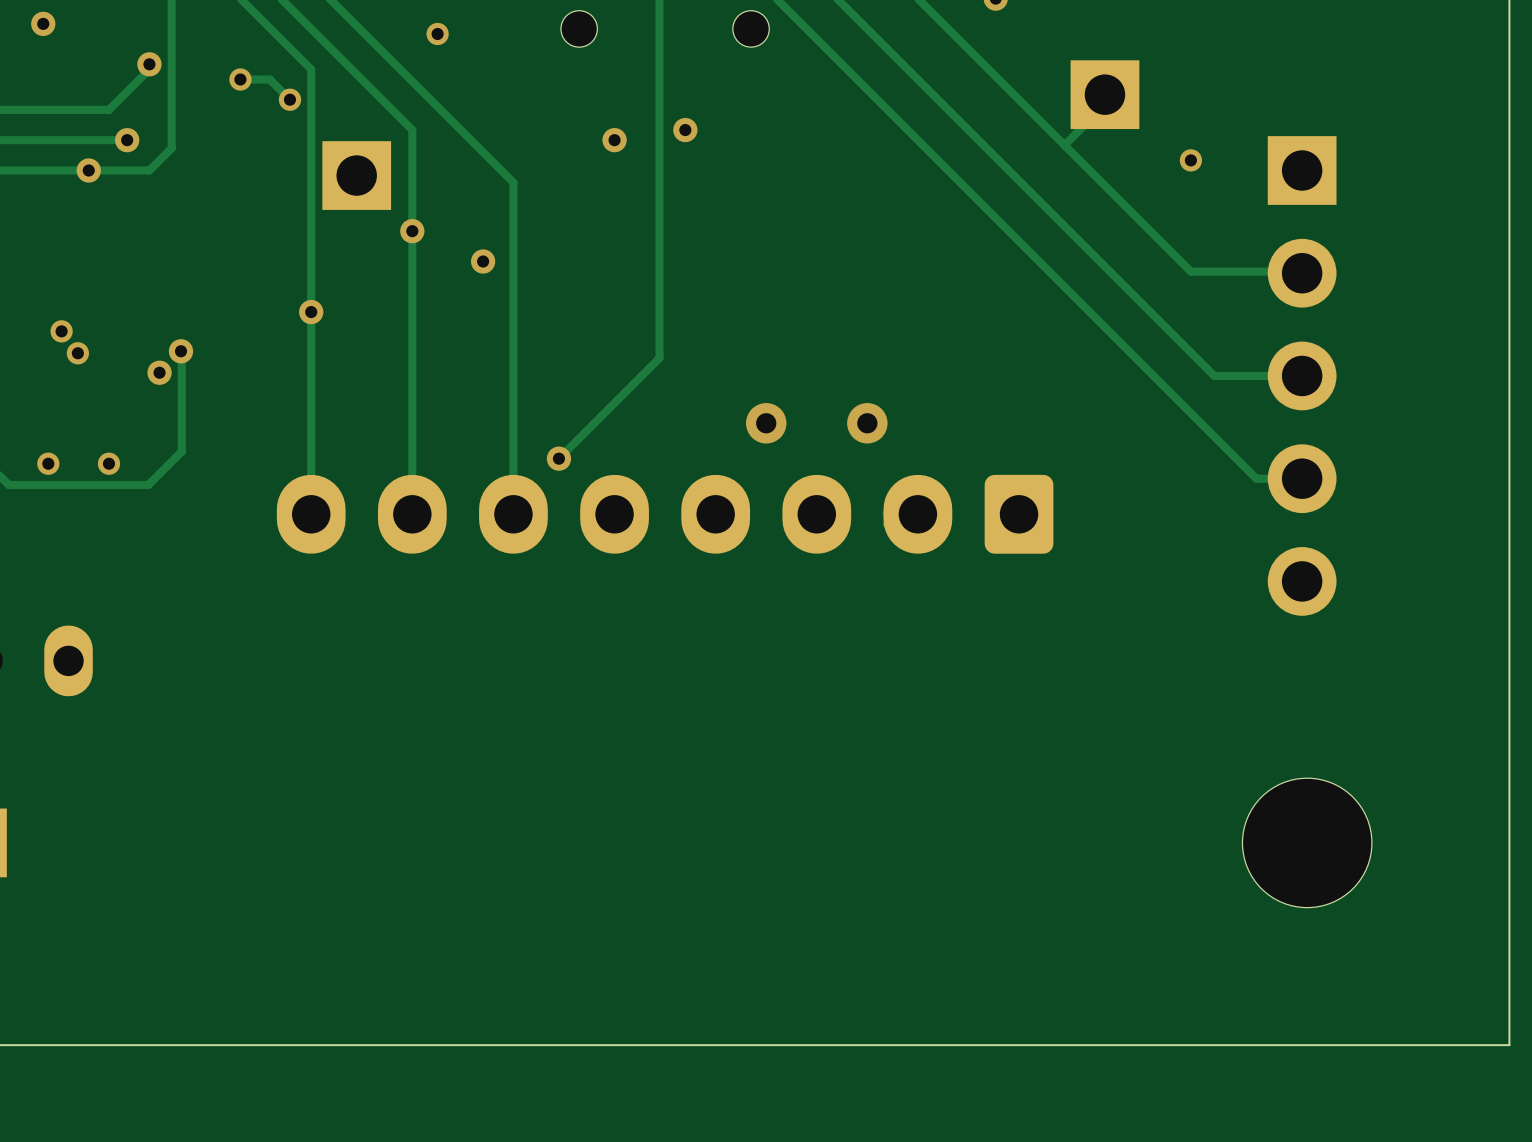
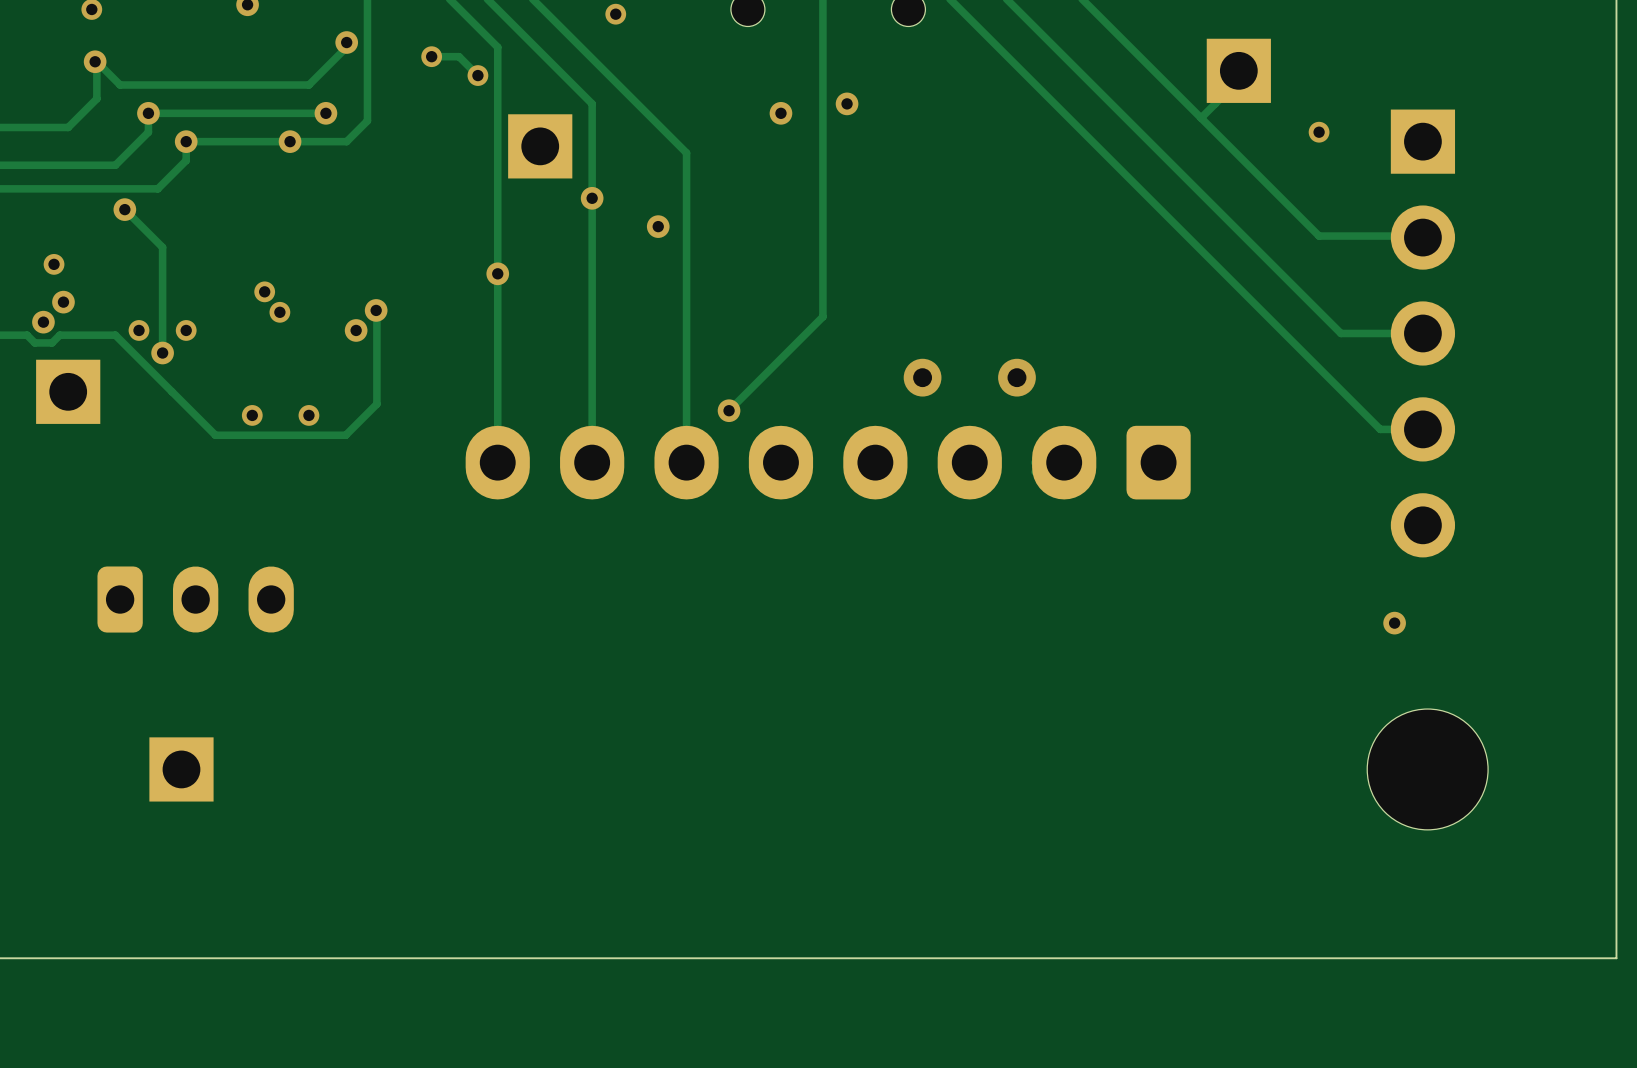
via: none -> (1394, 623)

